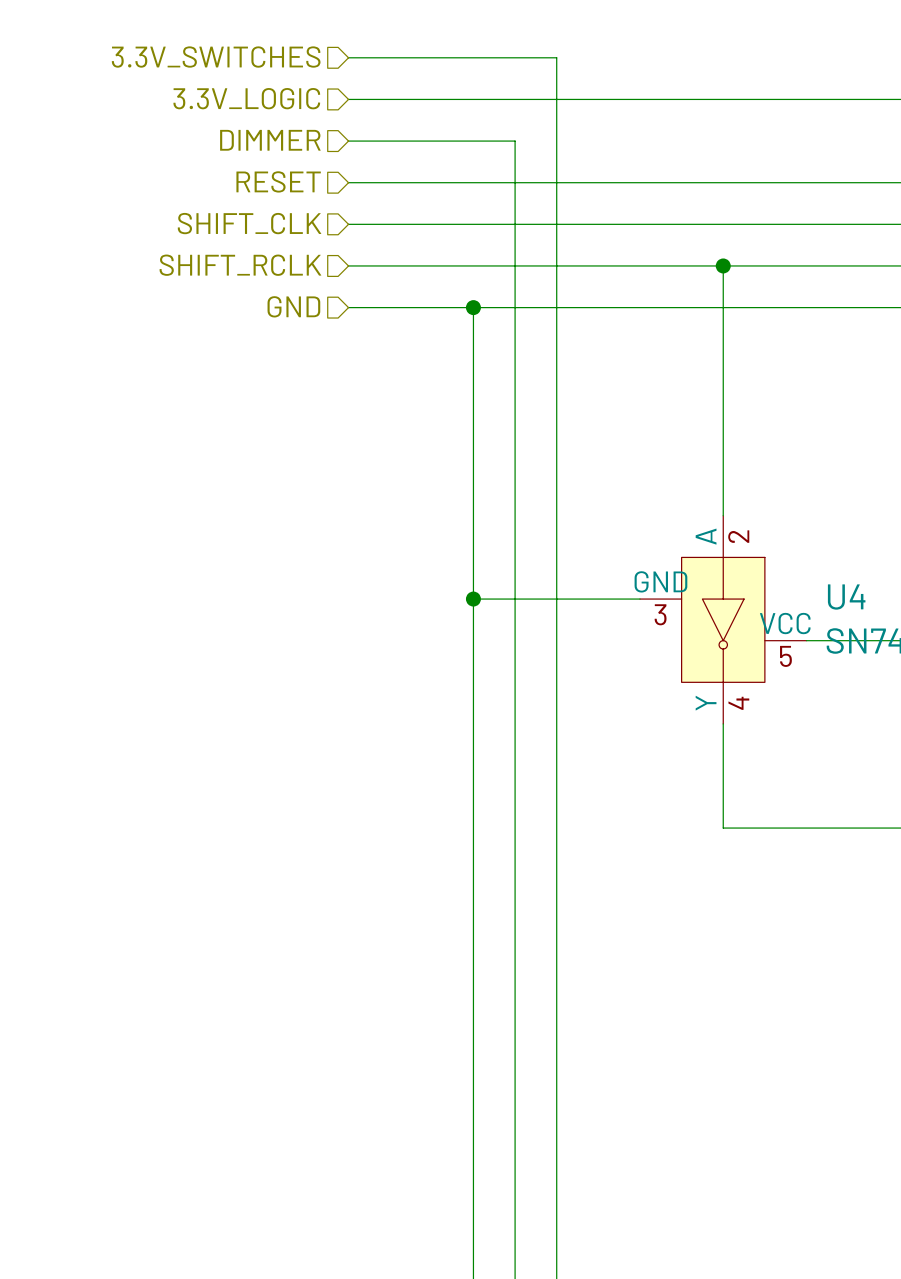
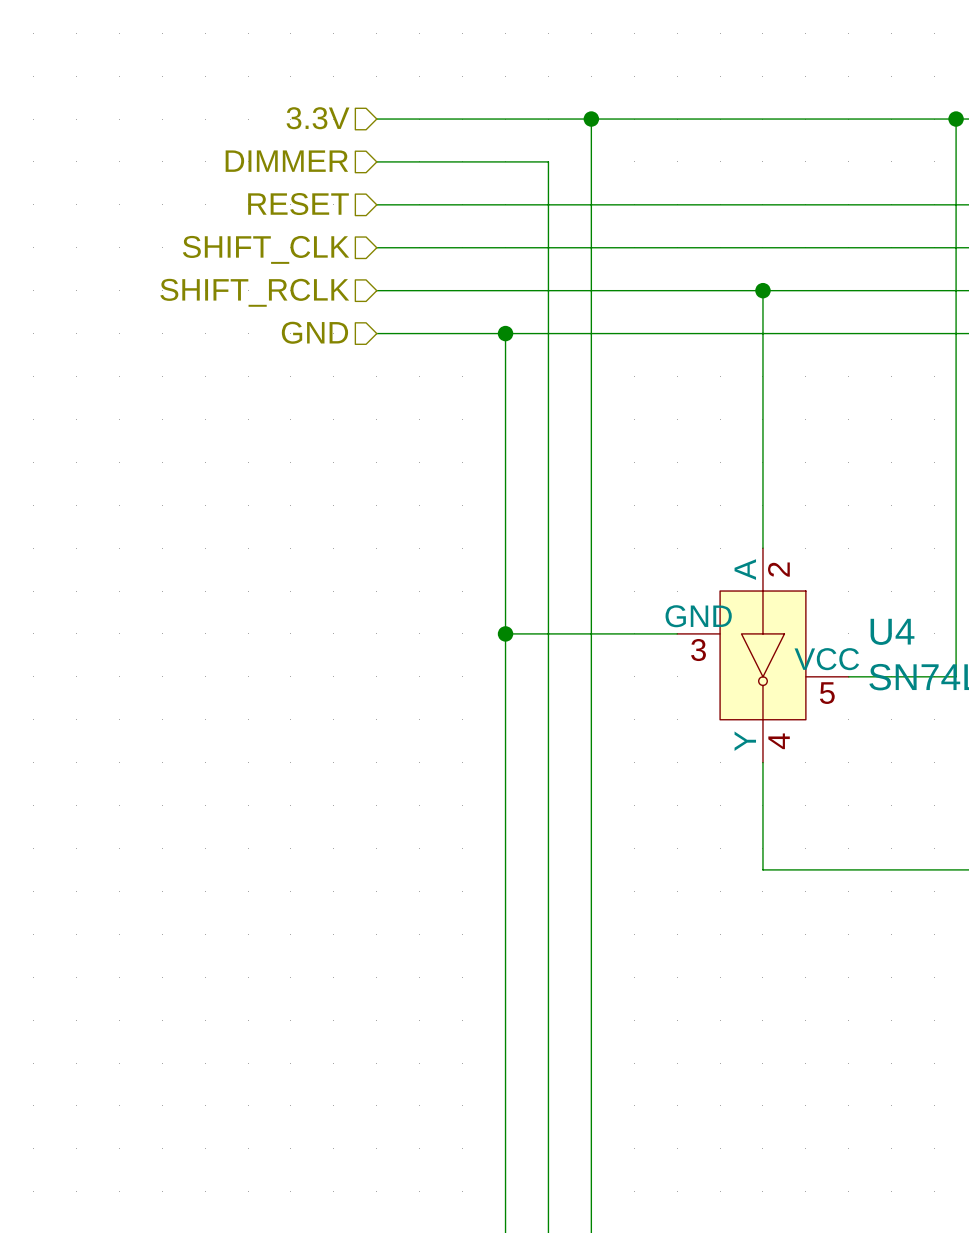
hierarchical label: 3.3V_SWITCHES (216, 57) -> none
wire: (348, 57) (556, 57) (556, 99) -> none
hierarchical label: 3.3V_LOGIC (246, 98) -> 3.3V (318, 118)
junction: none -> (591, 119)

